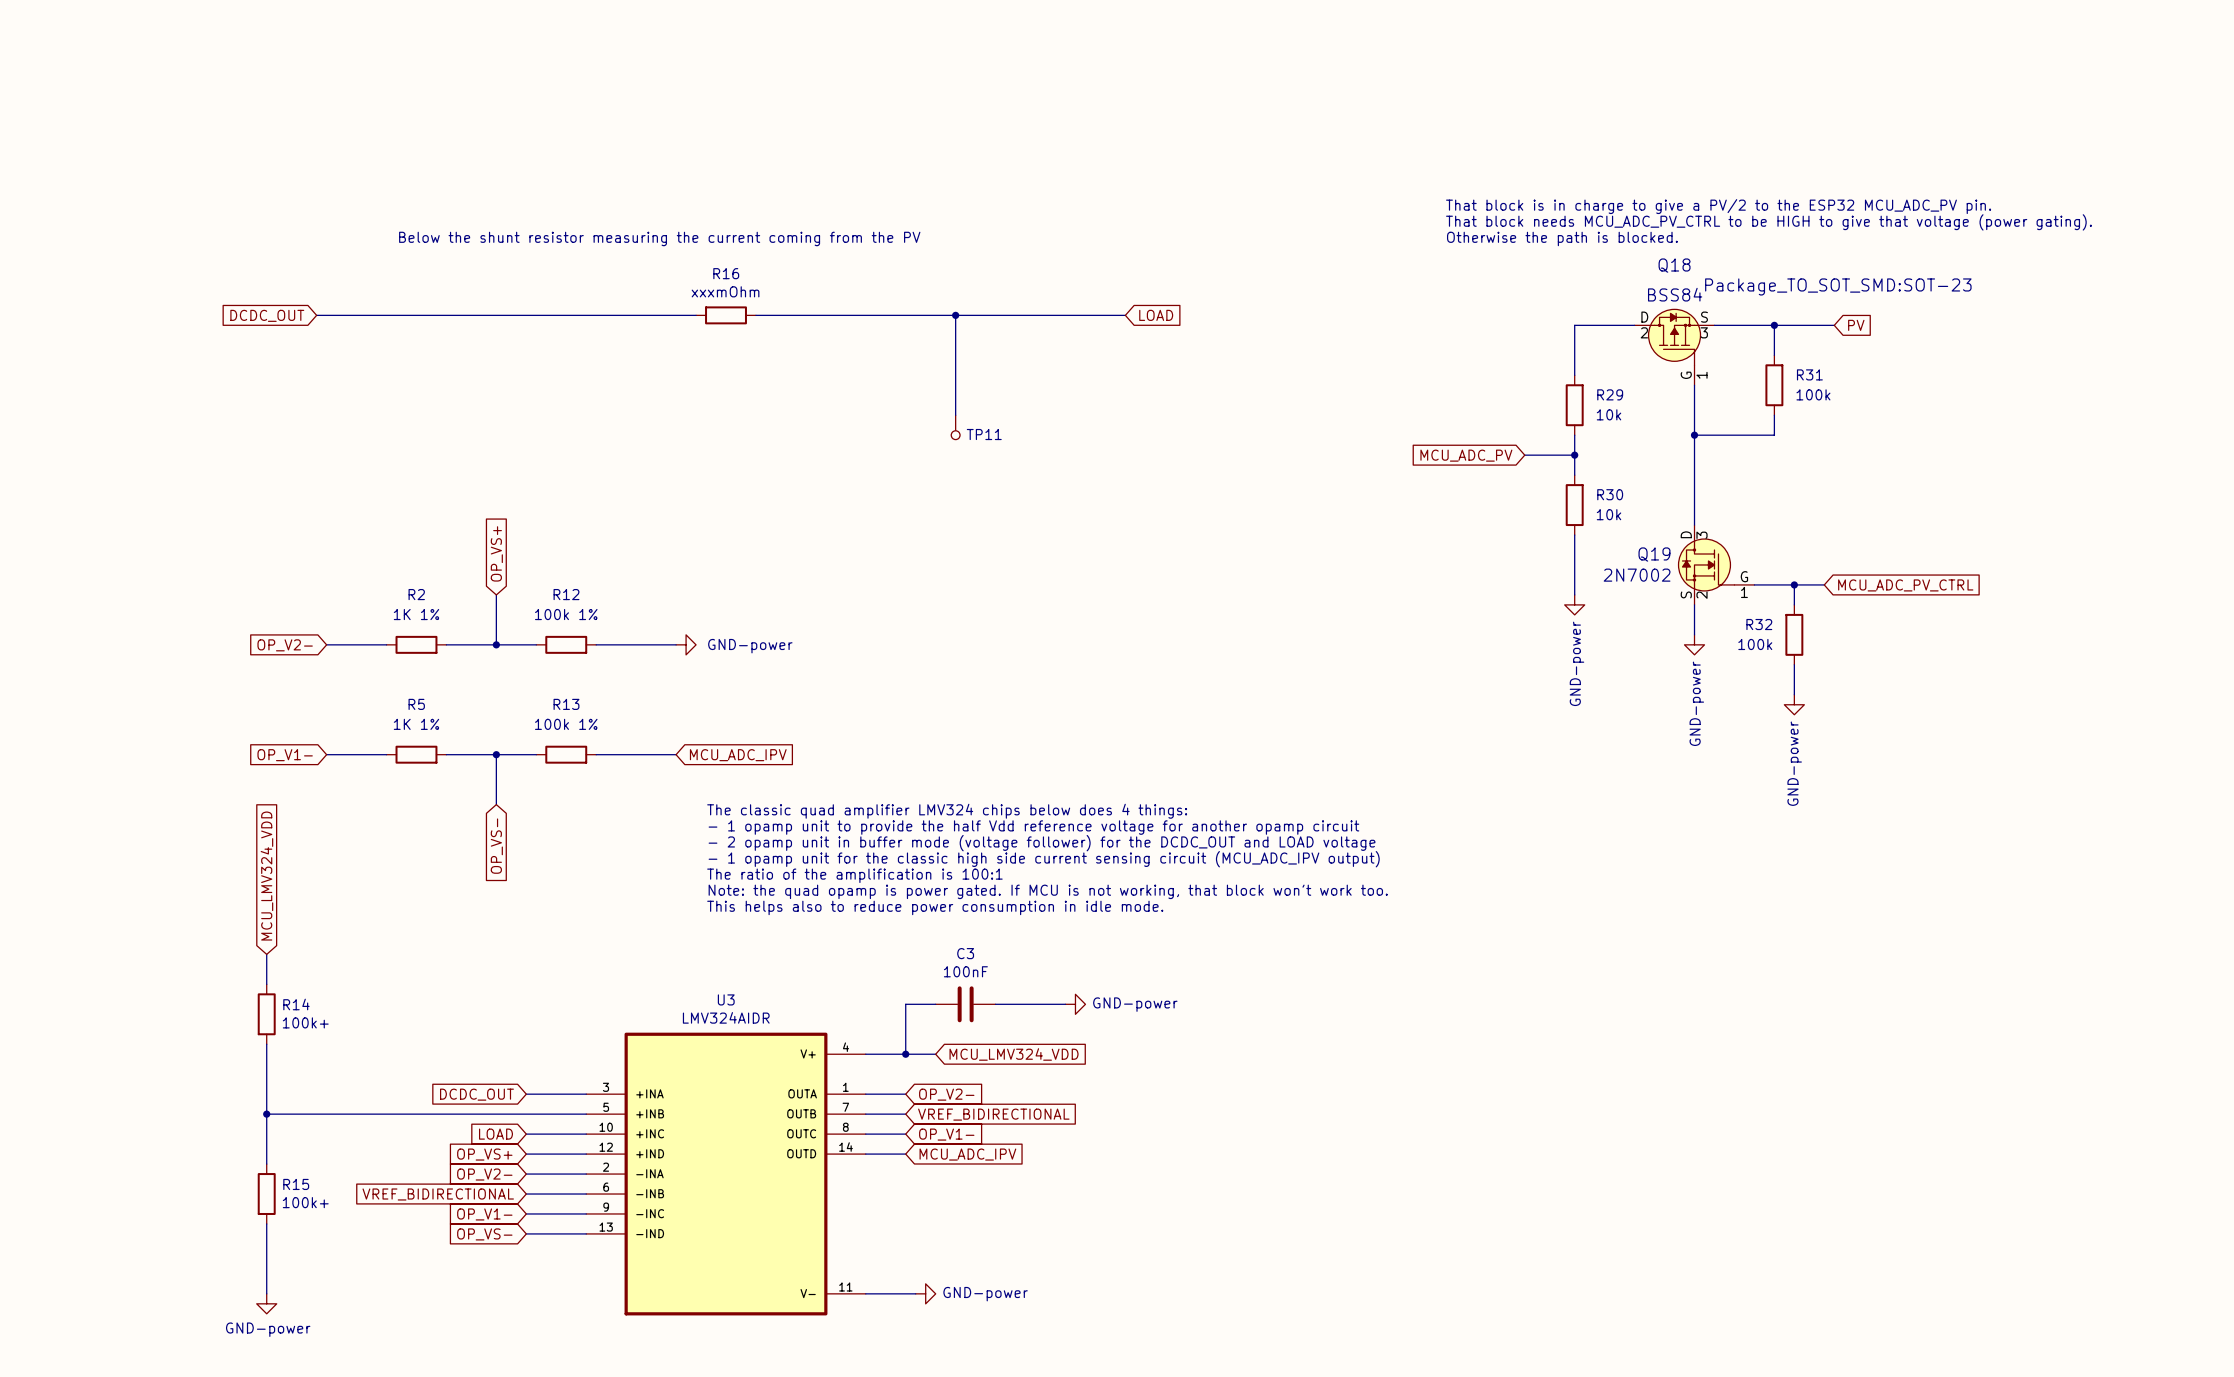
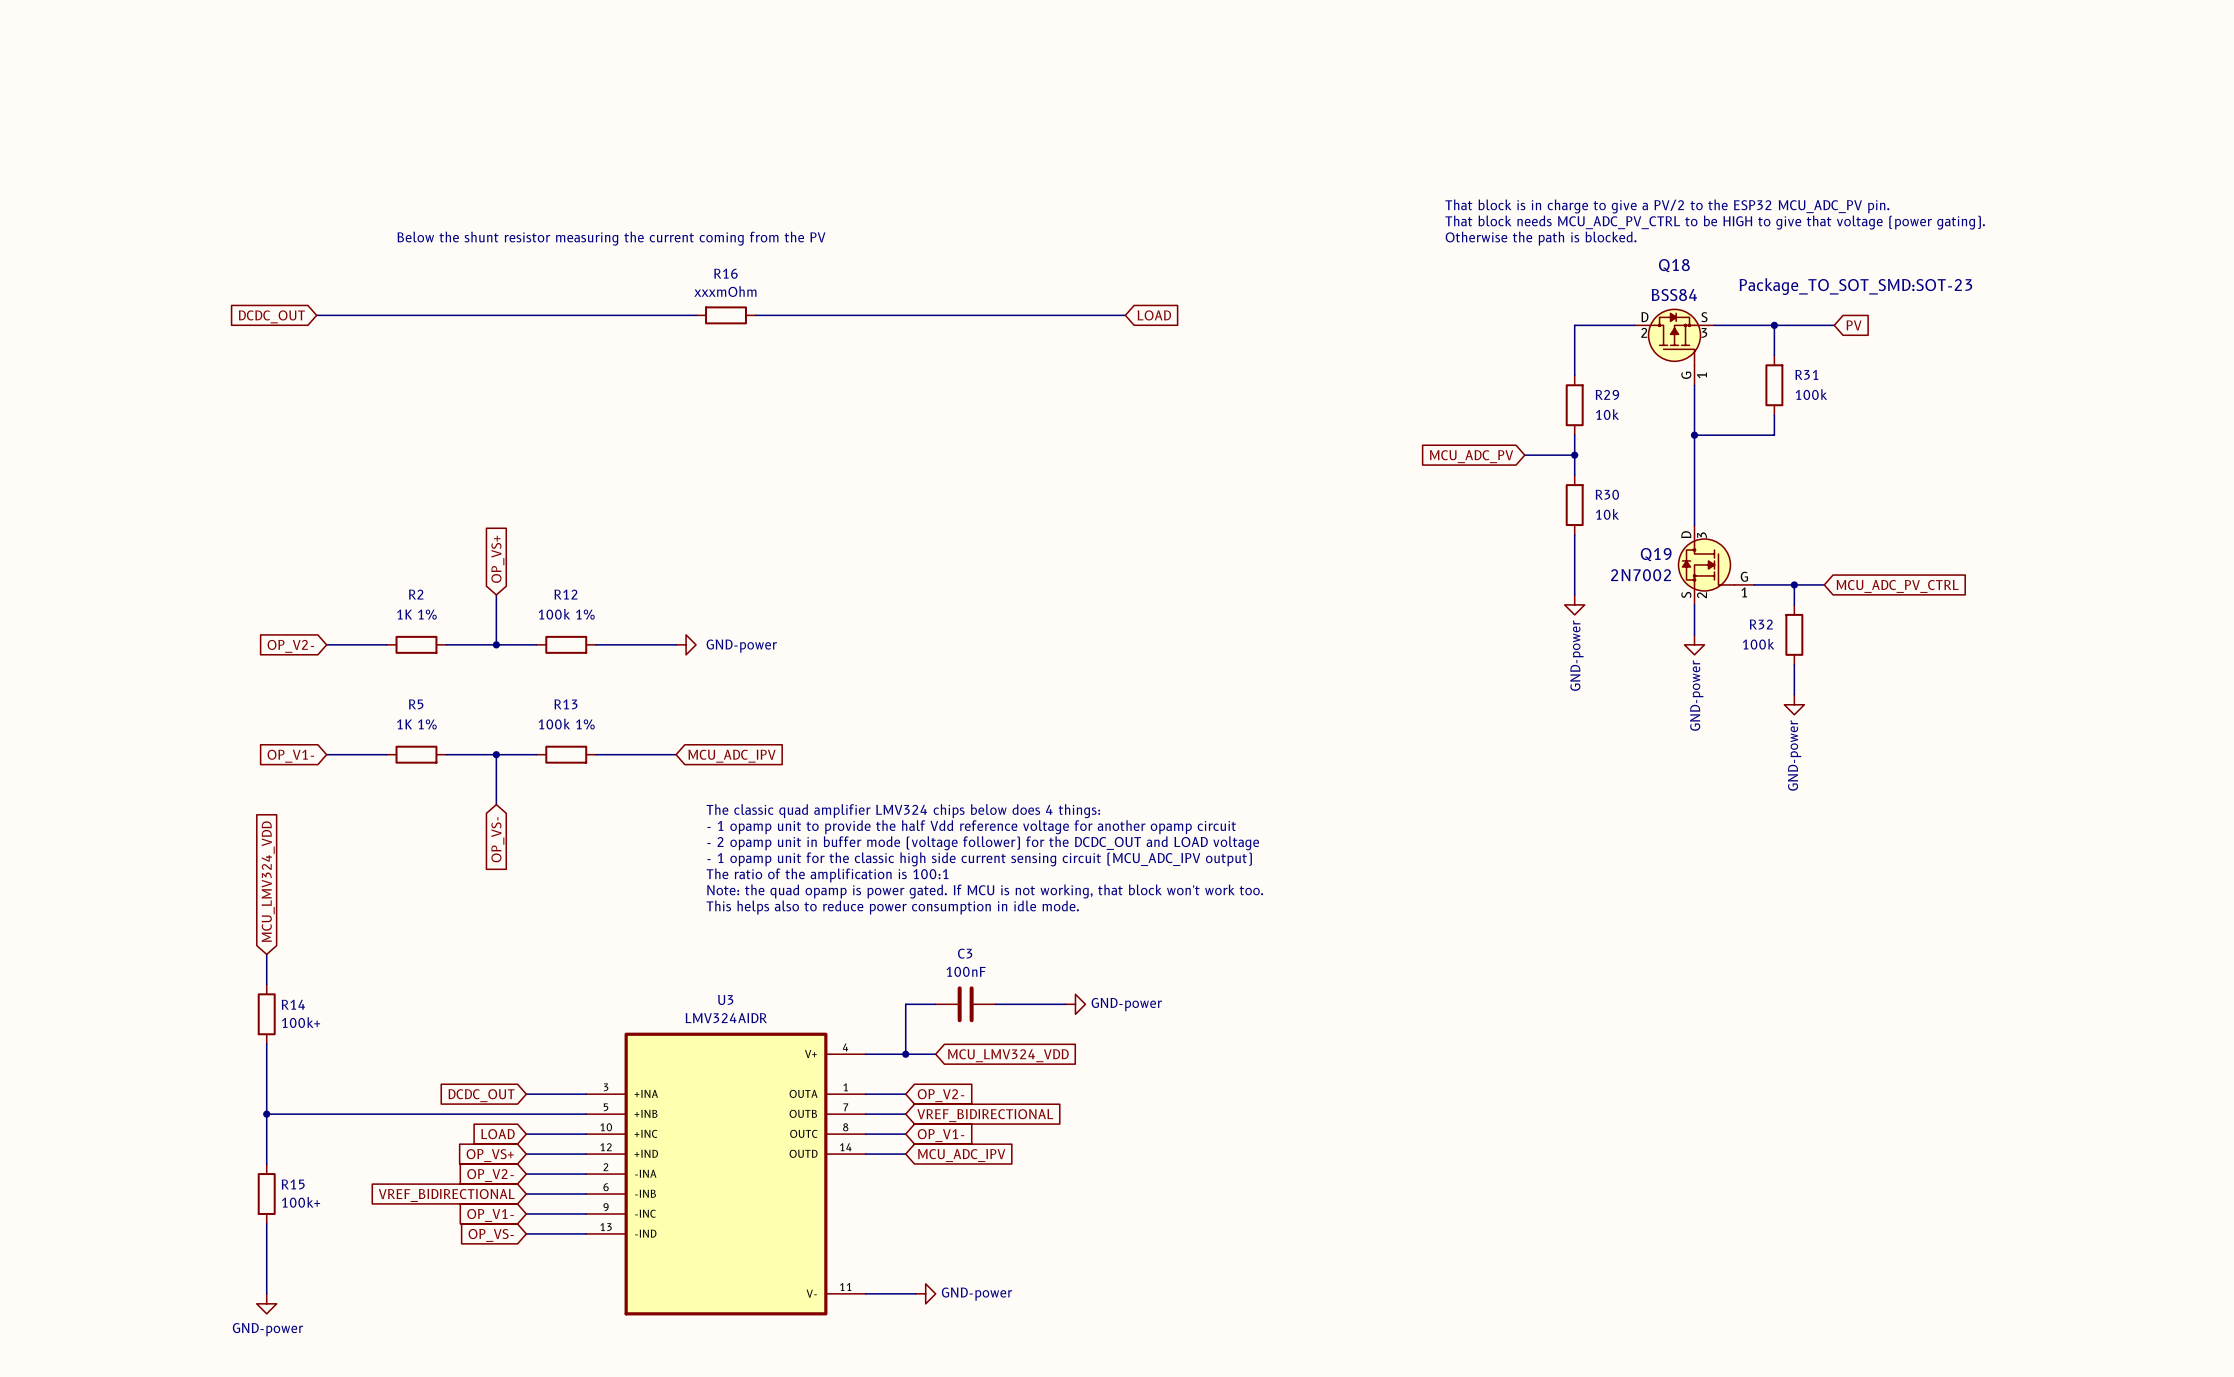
wire: (955, 315) (955, 415) -> none
junction: (955, 315) -> none
TP11: (955, 427) -> none

